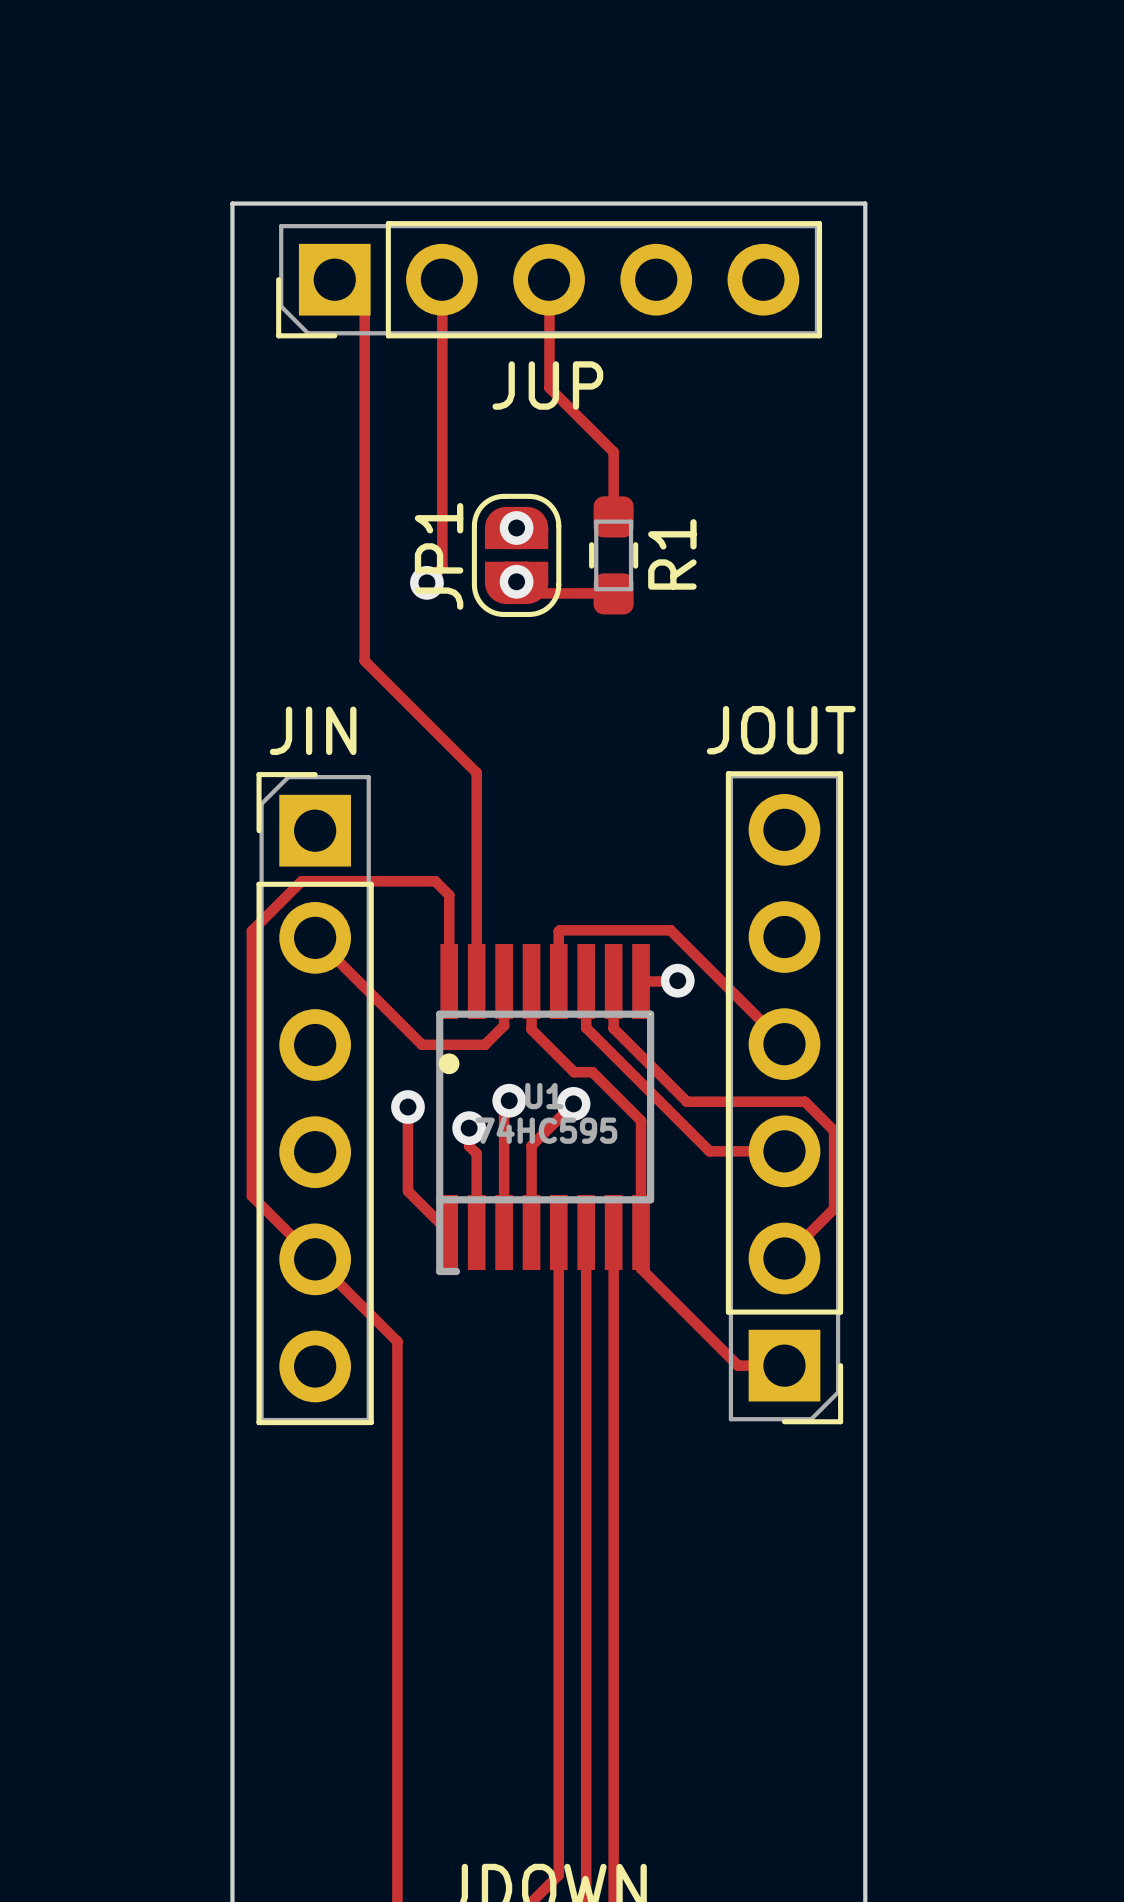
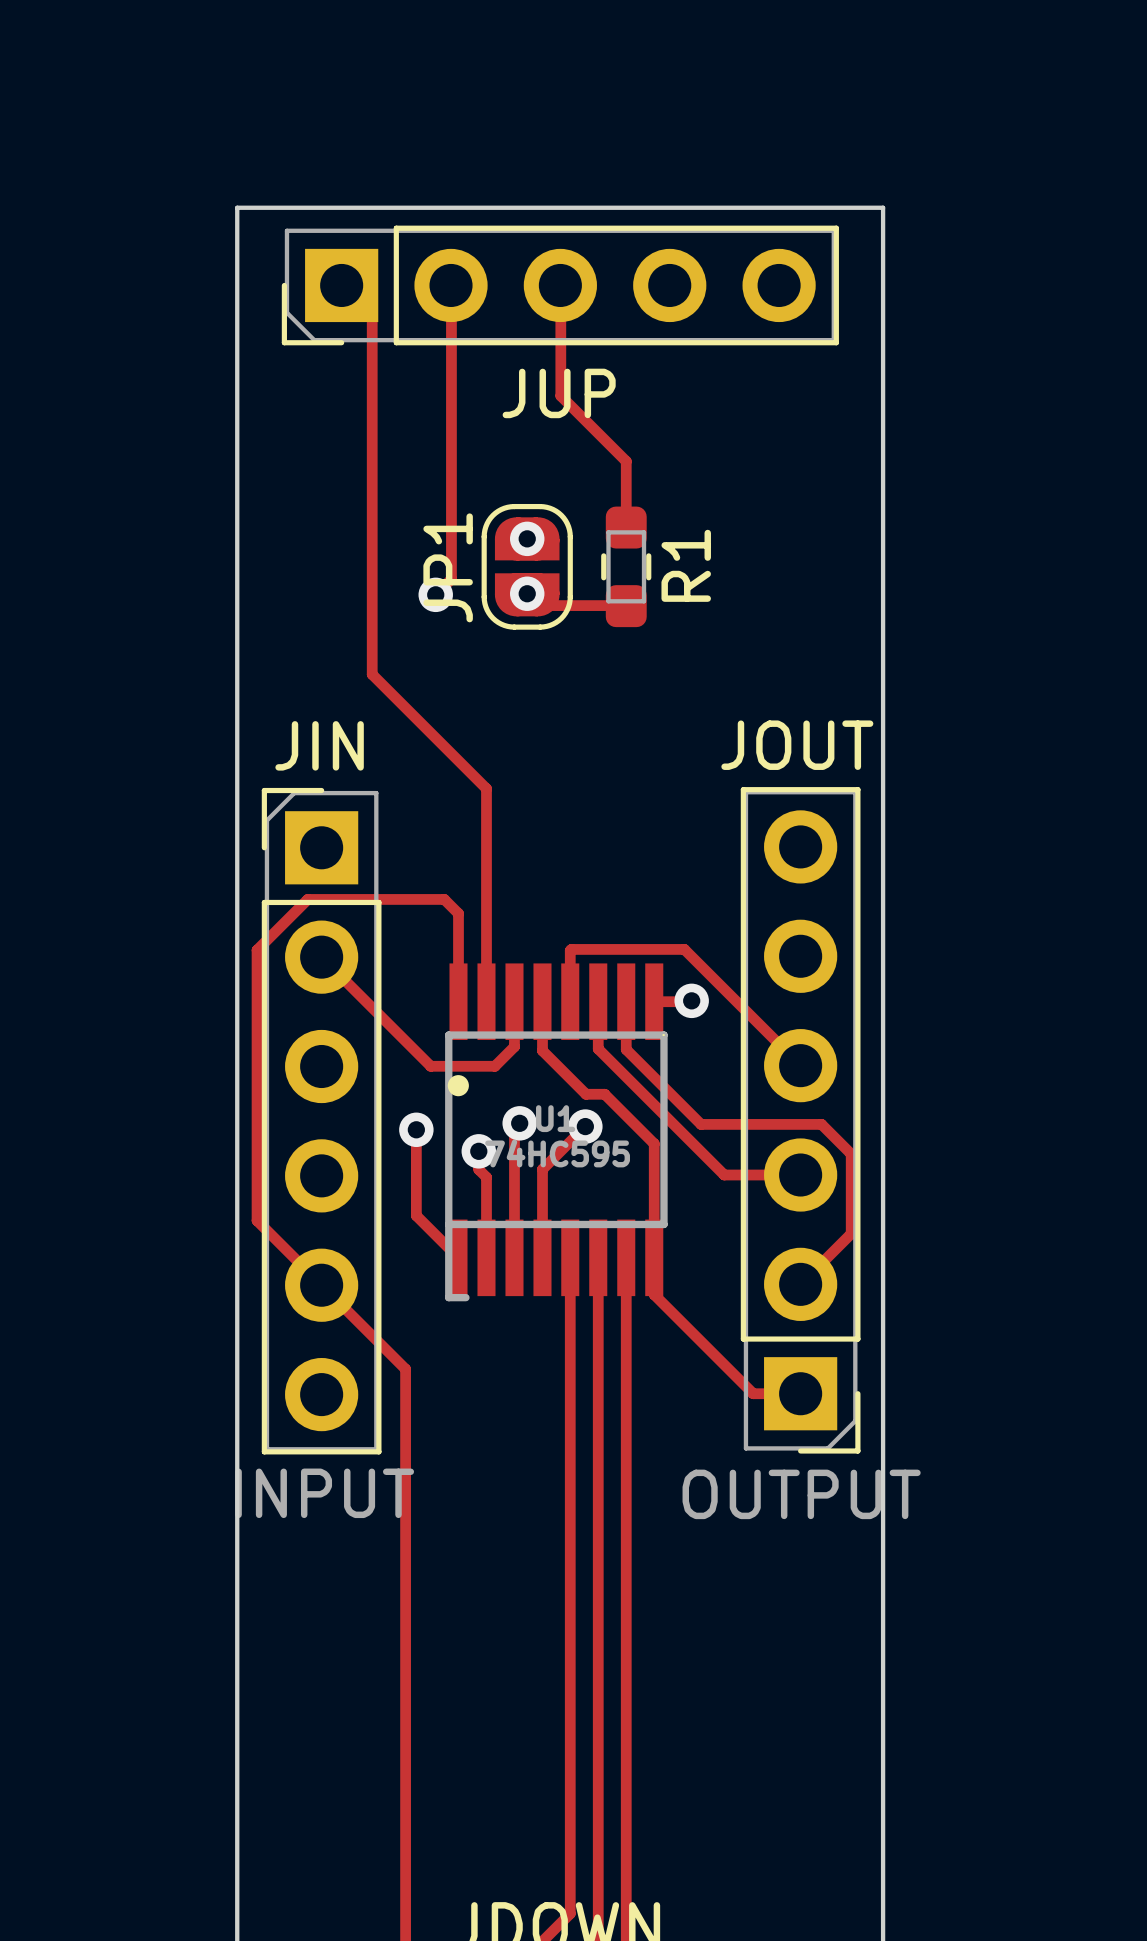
JIN value: none -> INPUT (324, 1493)
JOUT value: none -> OUTPUT (801, 1494)

